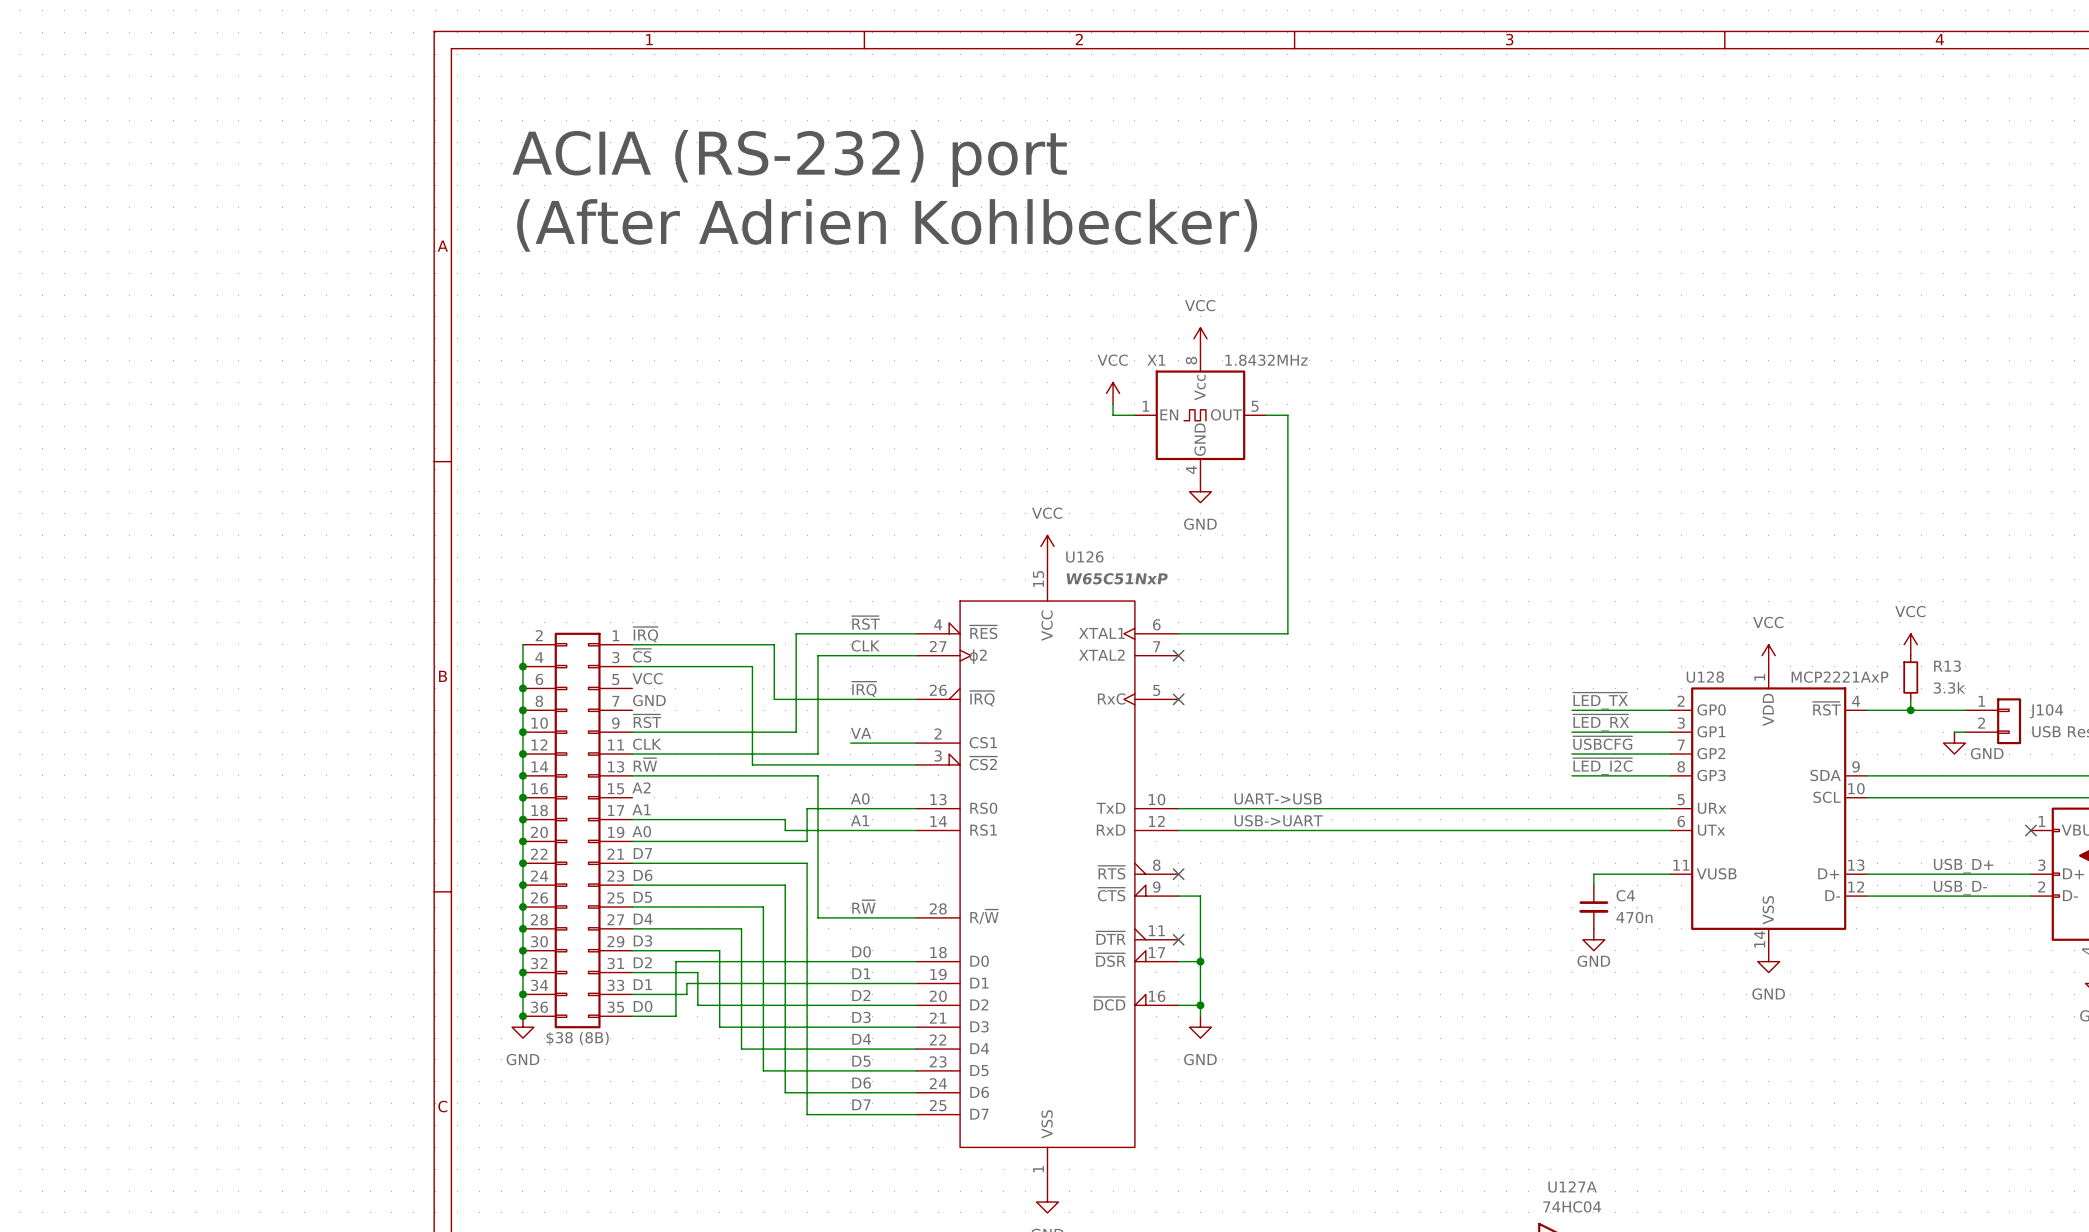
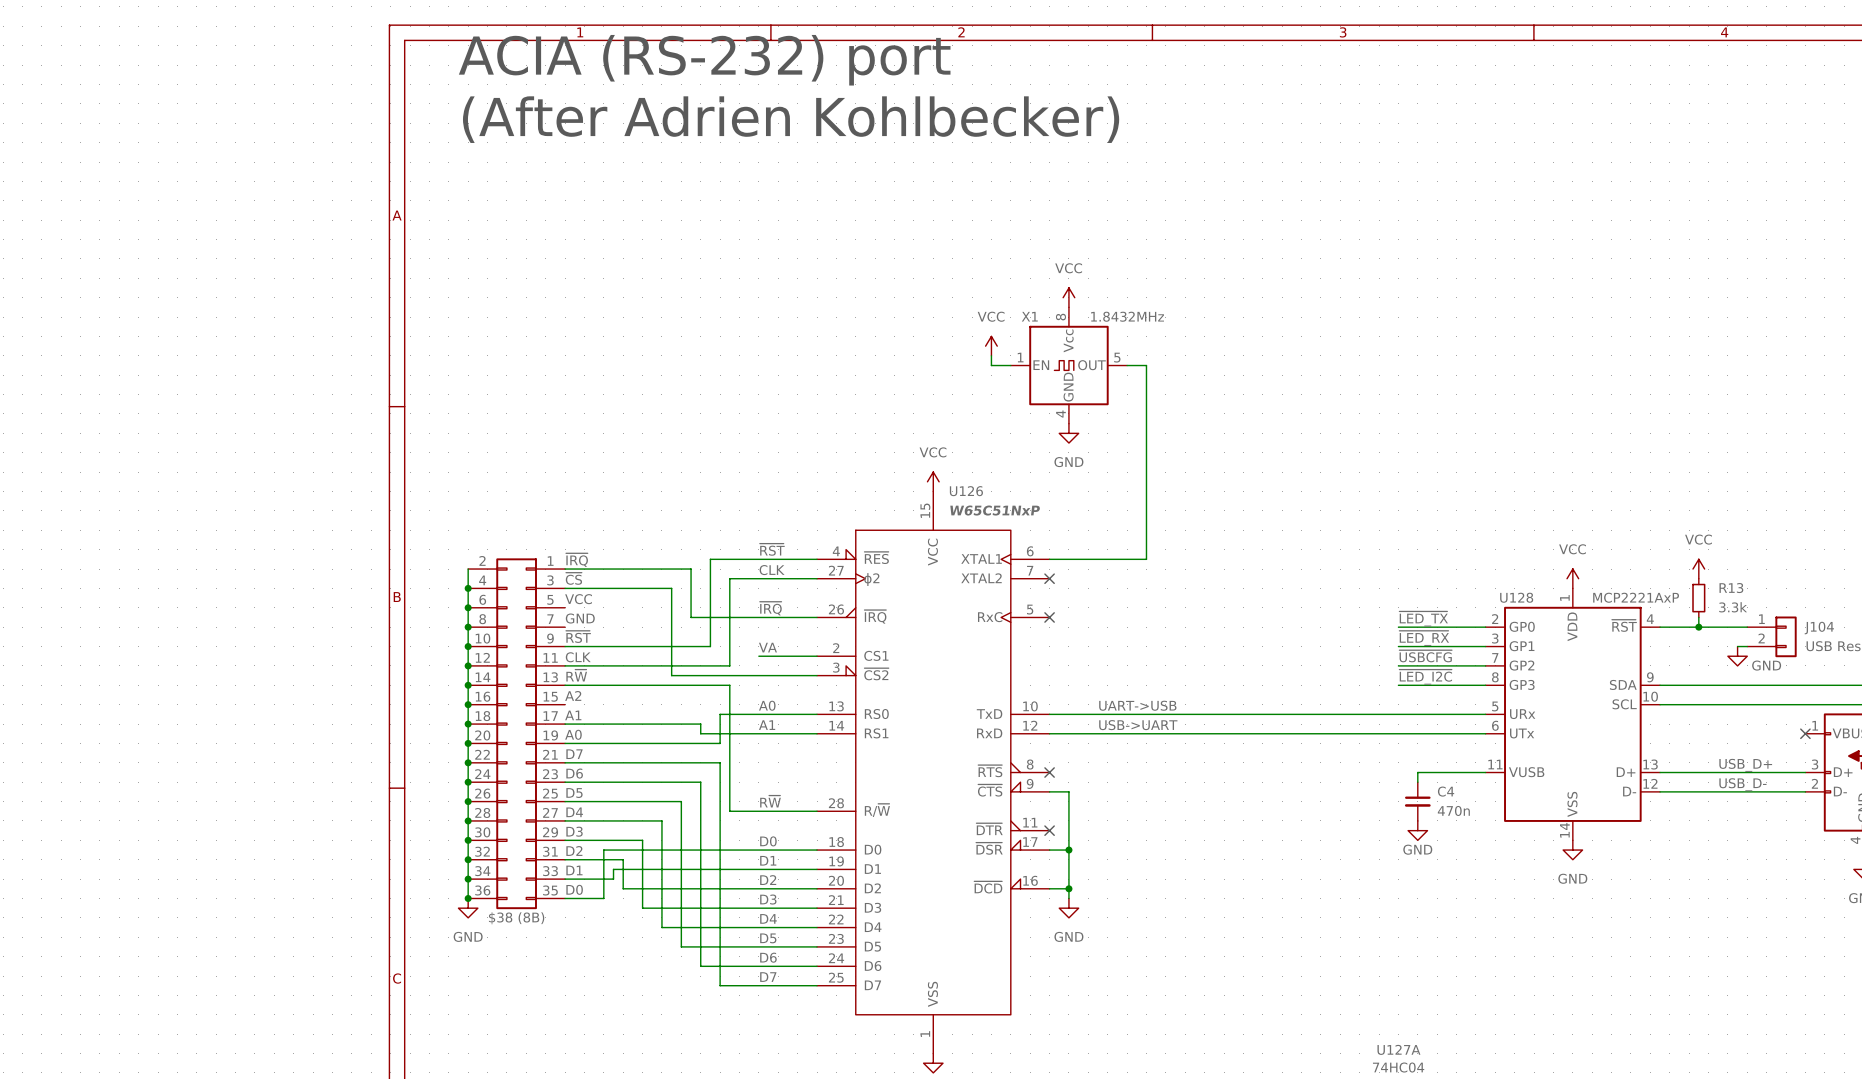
text position: ACIA (RS-232) port (789, 158) -> ACIA (RS-232) port (704, 60)
text position: (After Adrien Kohlbecker) (887, 225) -> (After Adrien Kohlbecker) (791, 119)

